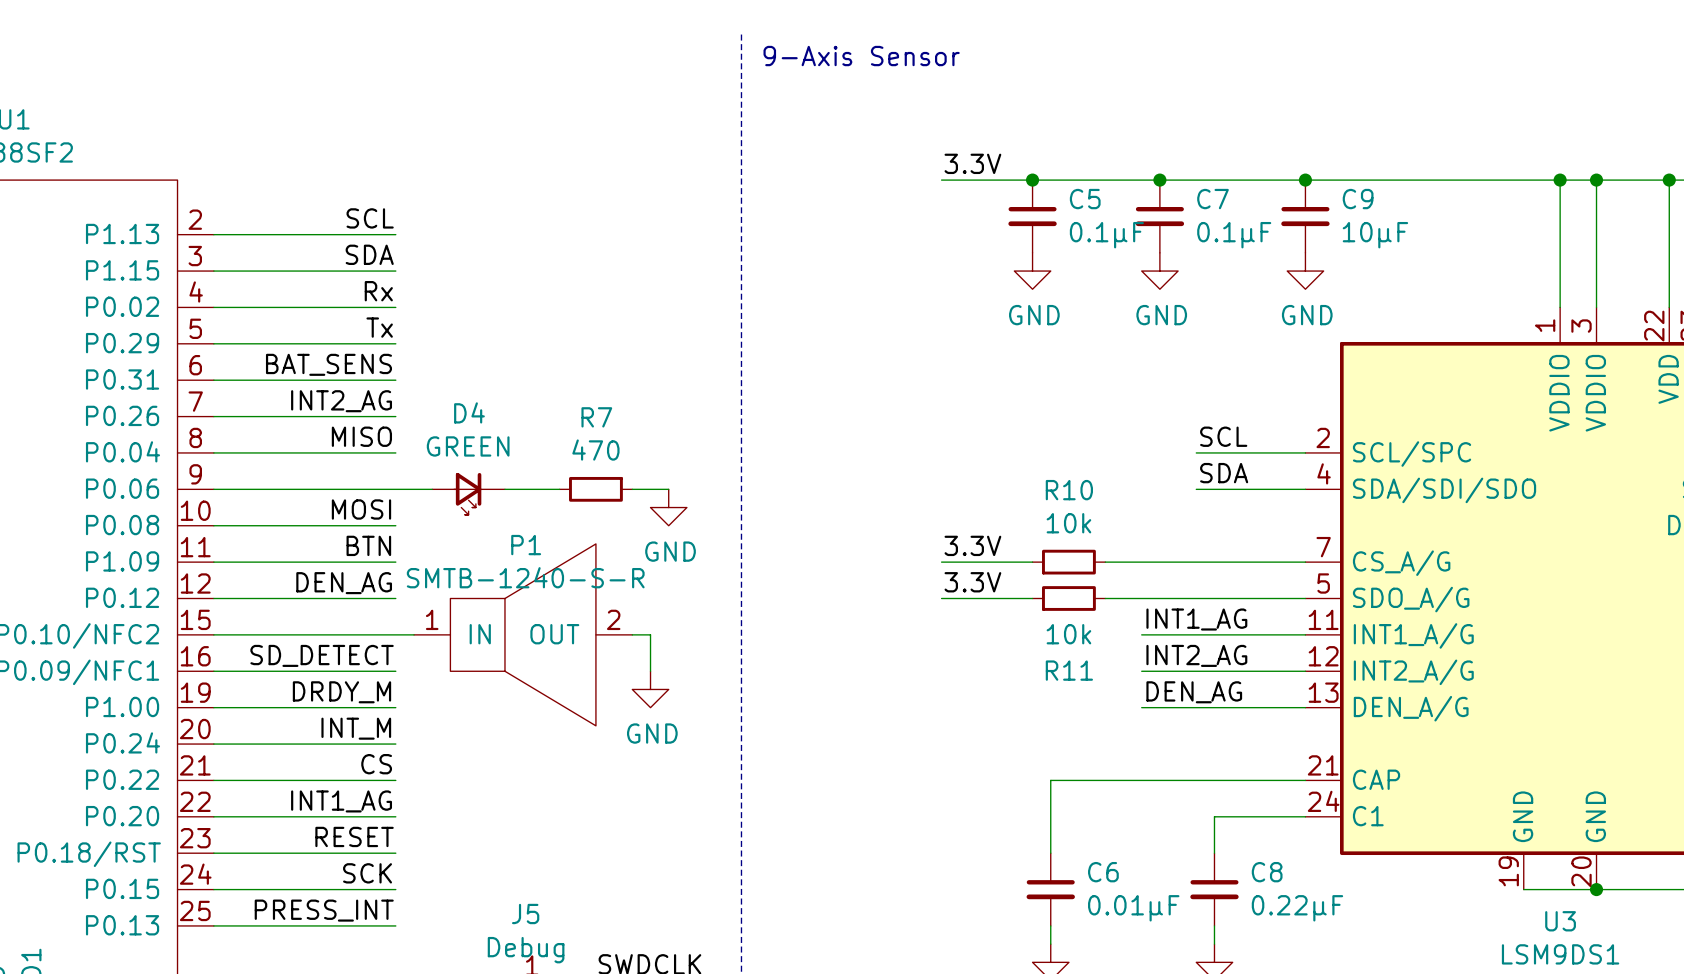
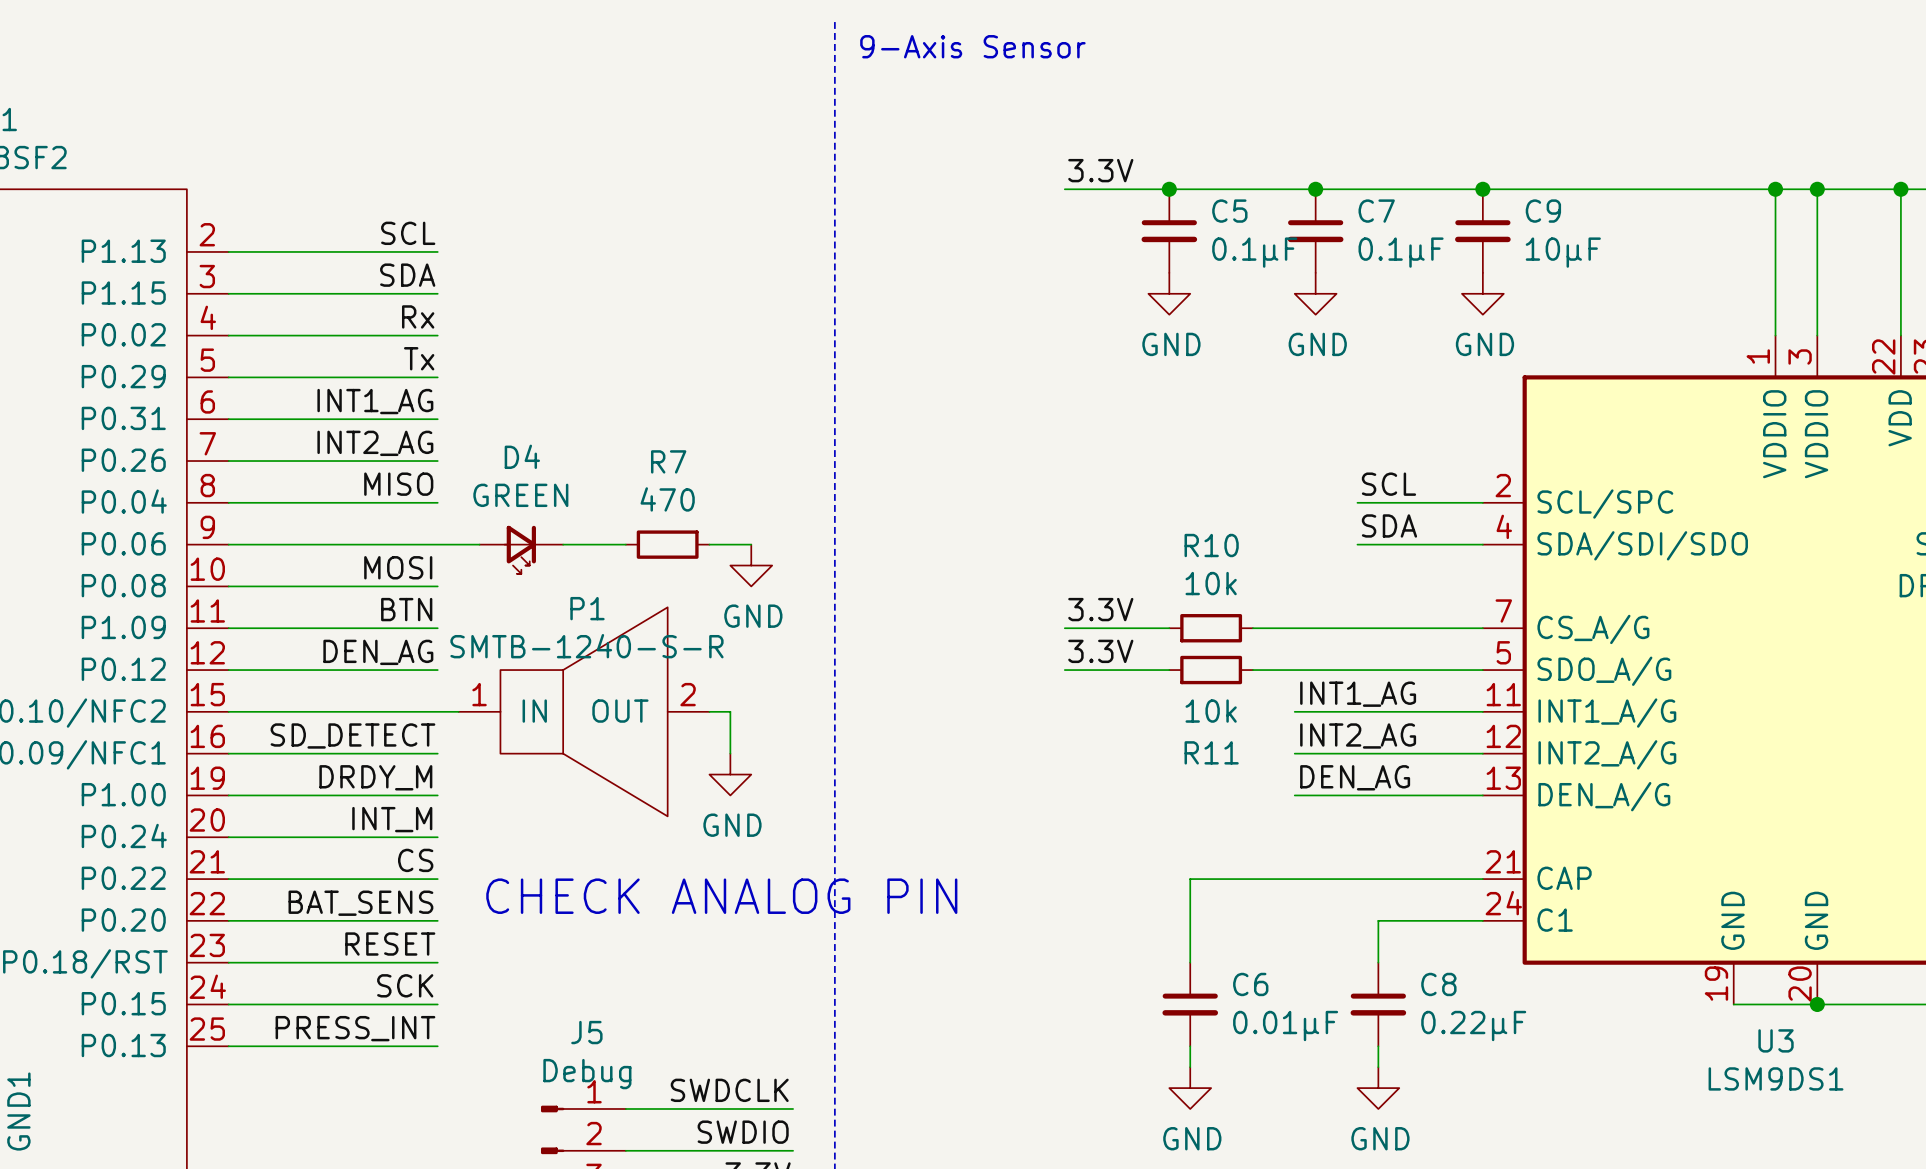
label: BAT_SENS (328, 364) -> INT1_AG (375, 401)
text: none -> CHECK ANALOG PIN (721, 896)
label: INT1_AG (341, 801) -> BAT_SENS (360, 903)

